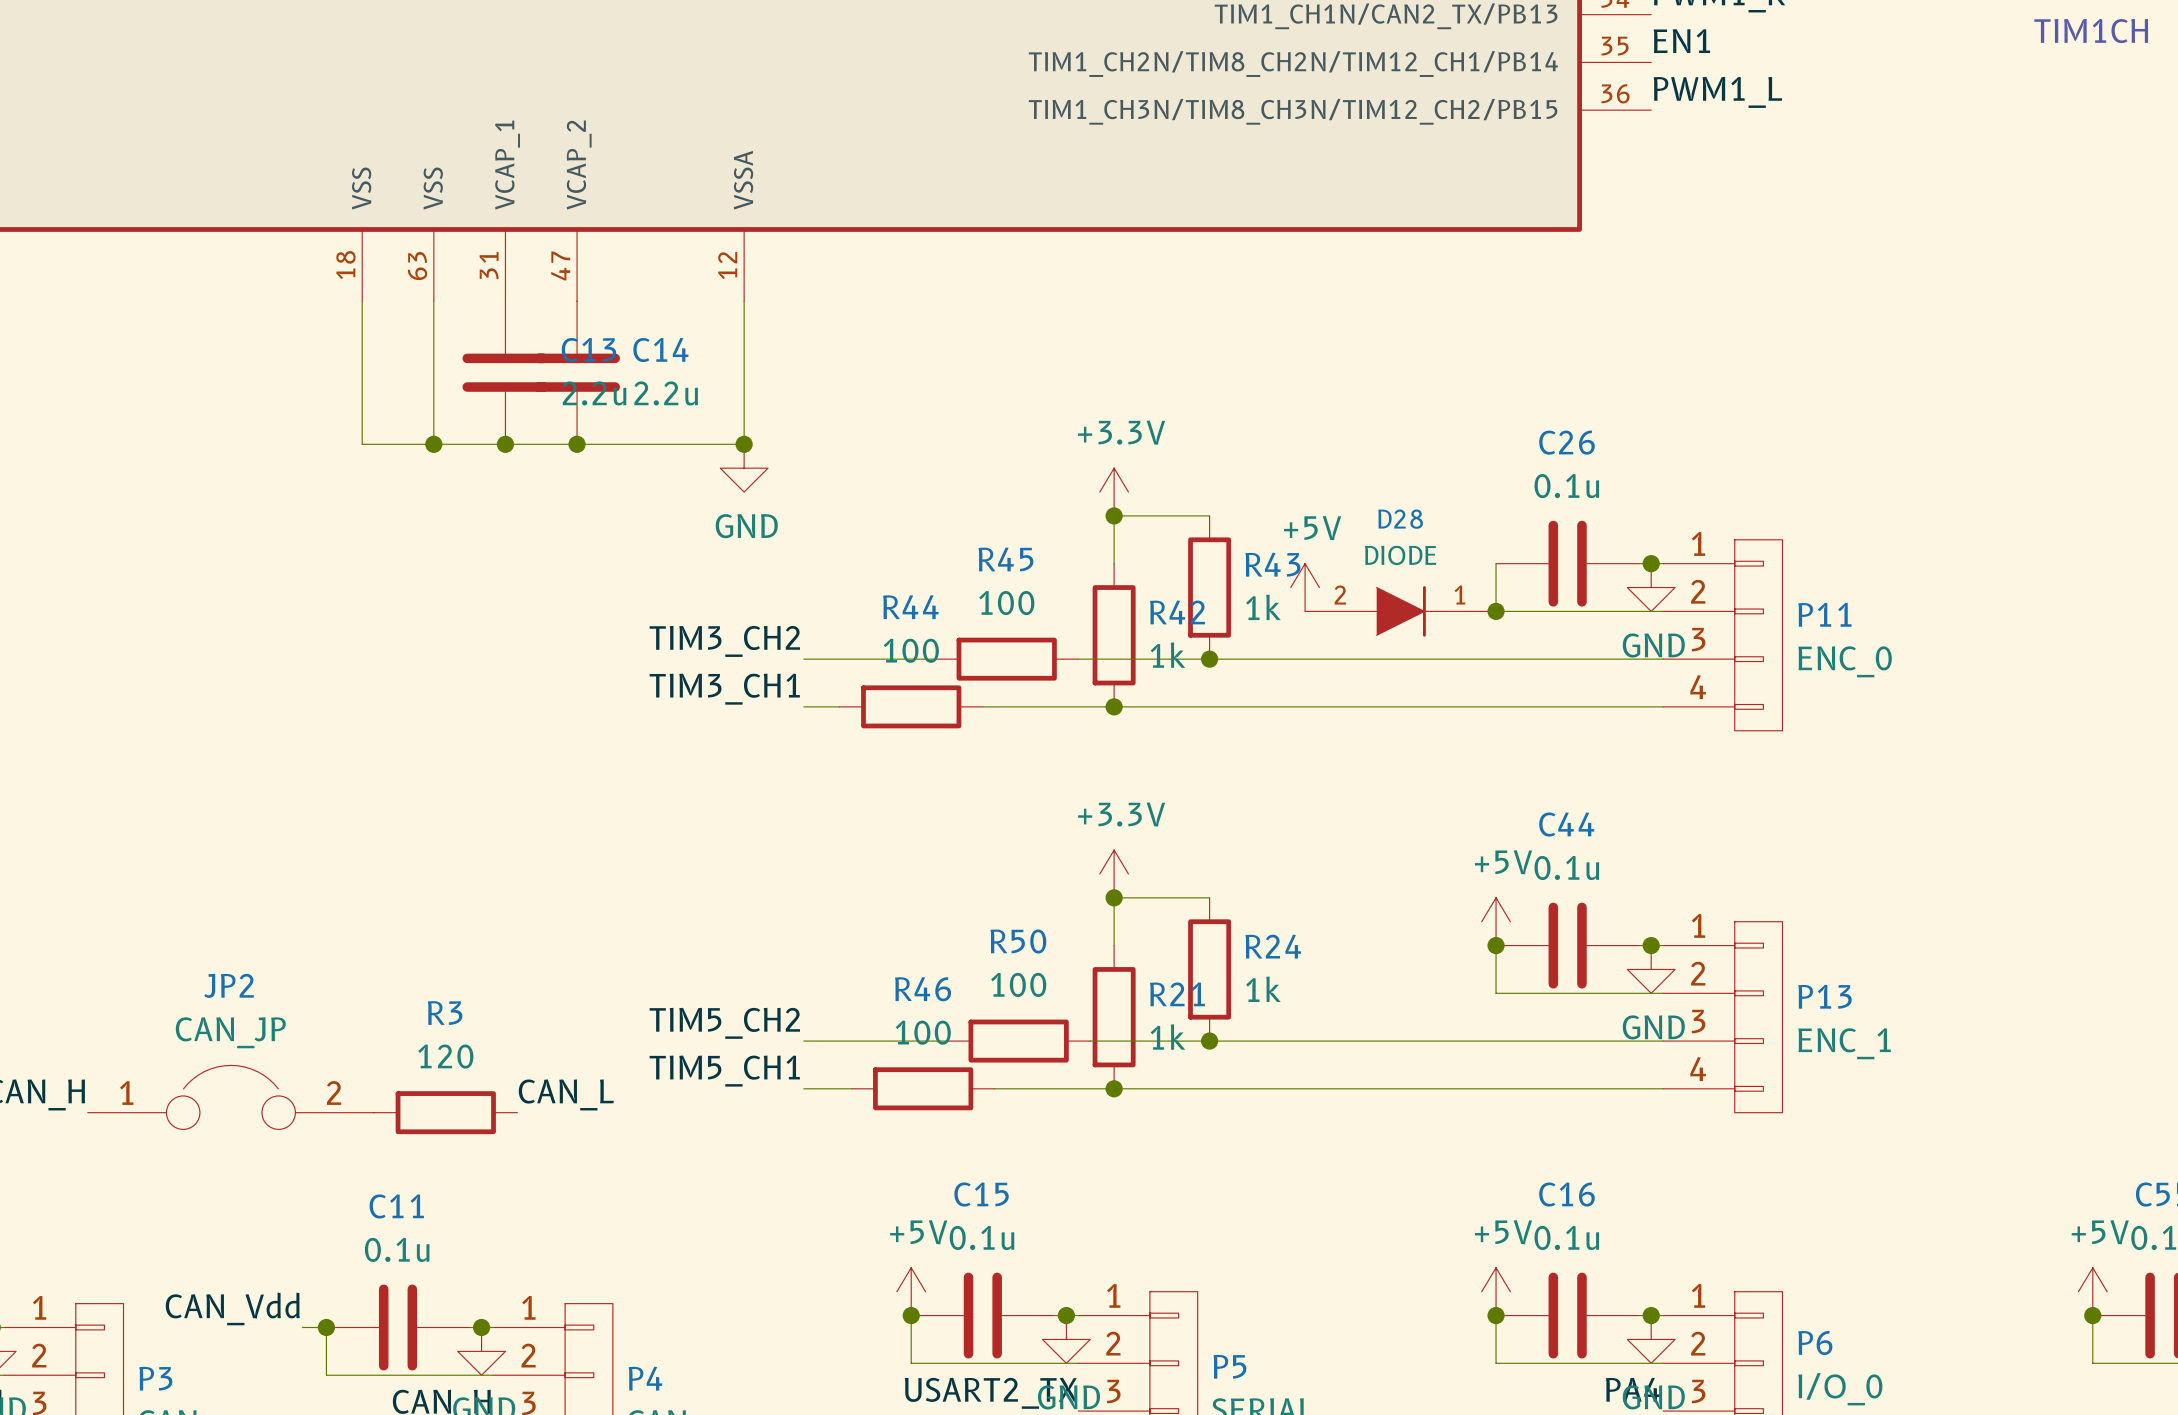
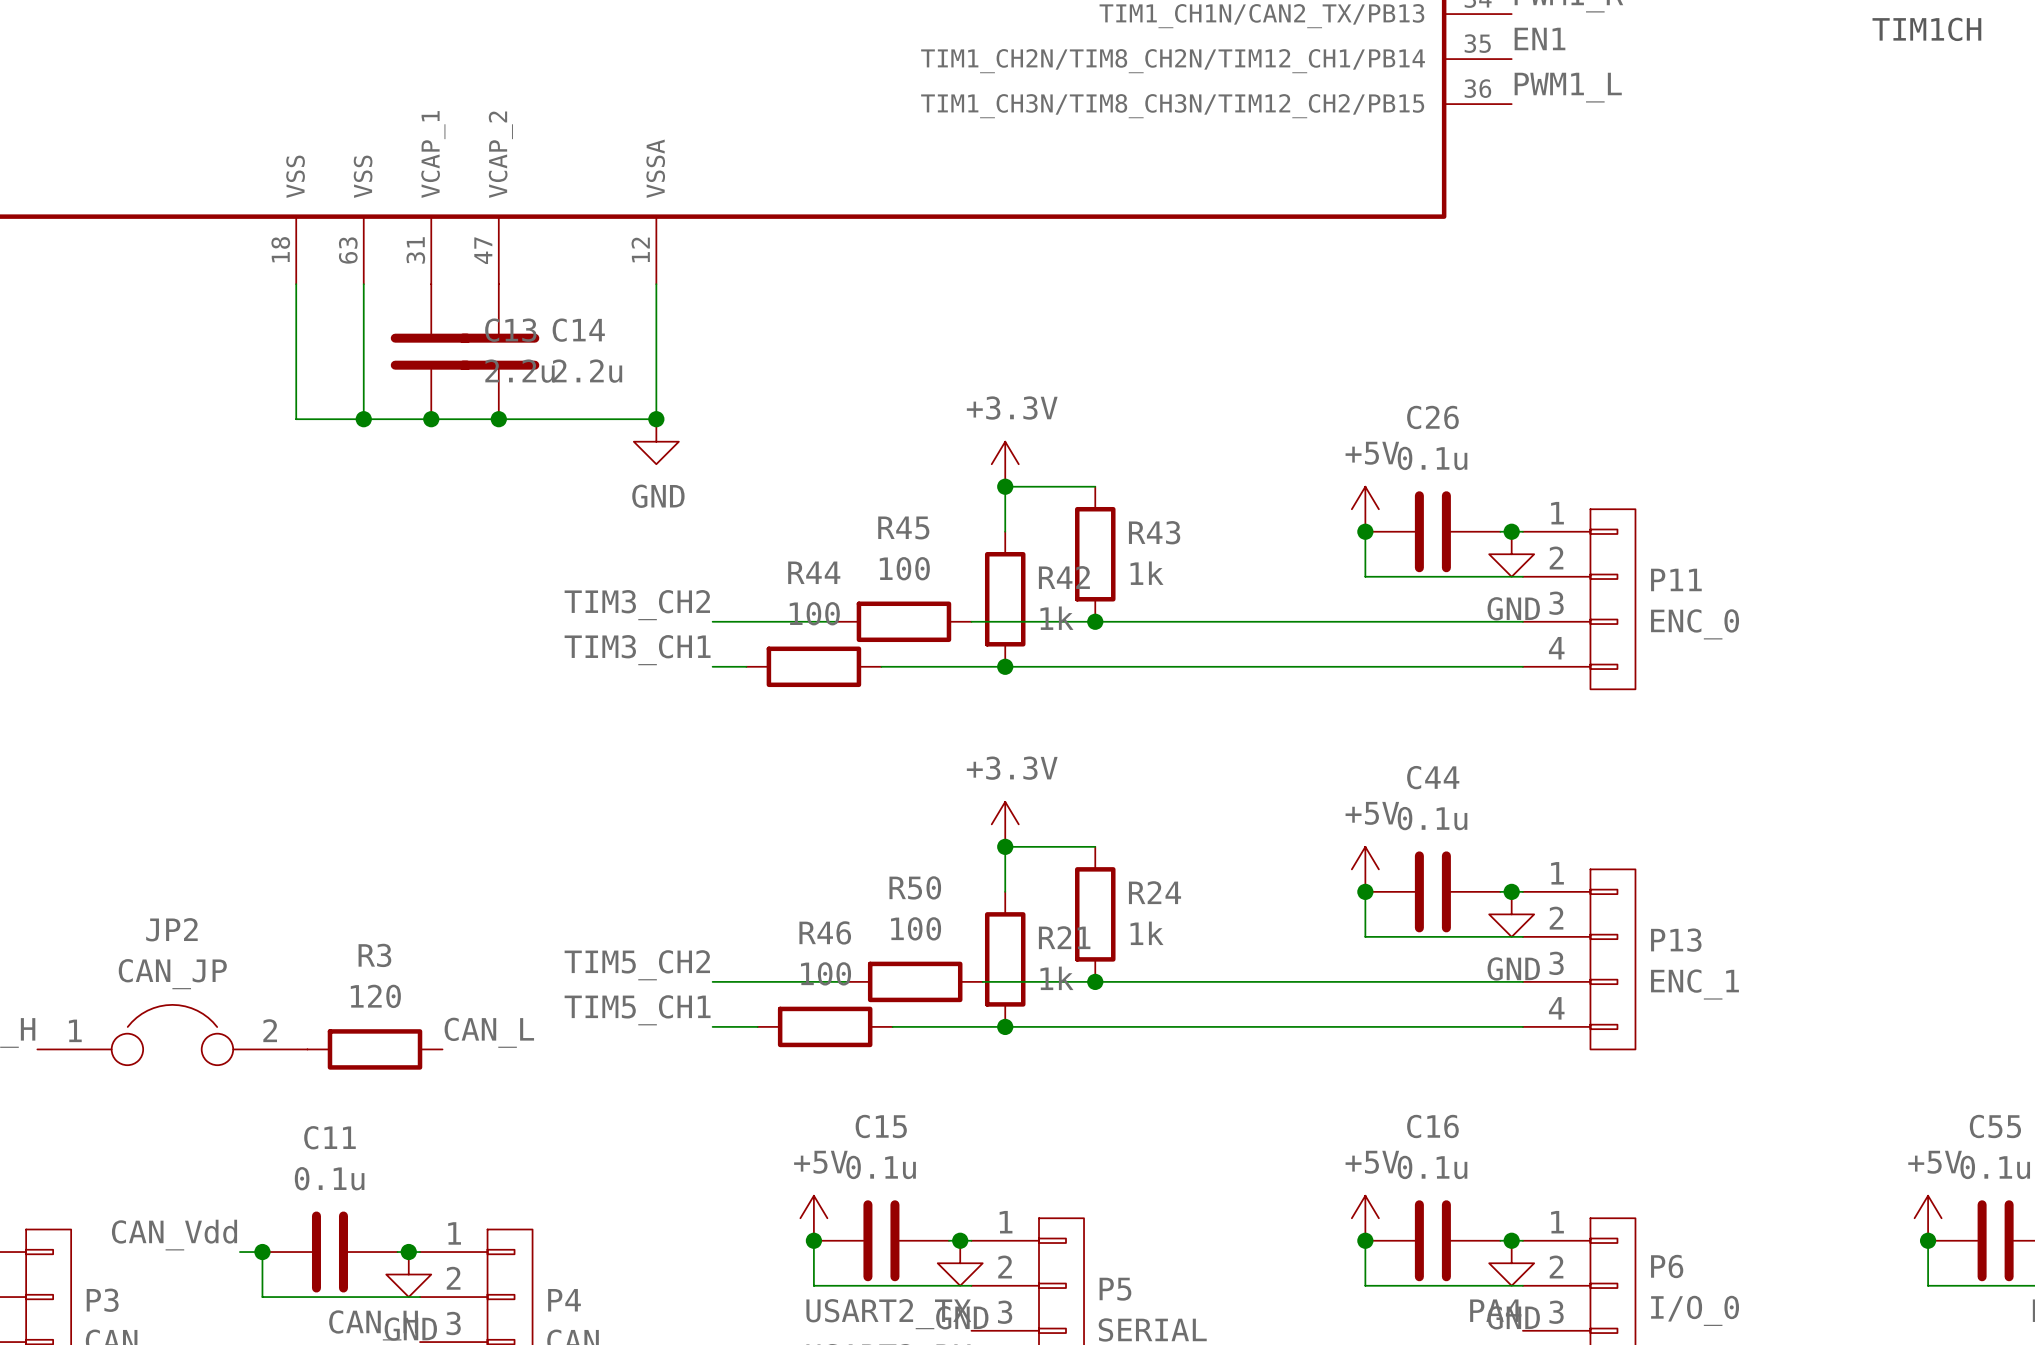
power symbol position: +5V (1305, 587) -> +5V (1365, 509)
D28: DIODE (1400, 611) -> none
junction position: (1496, 611) -> (1365, 531)

